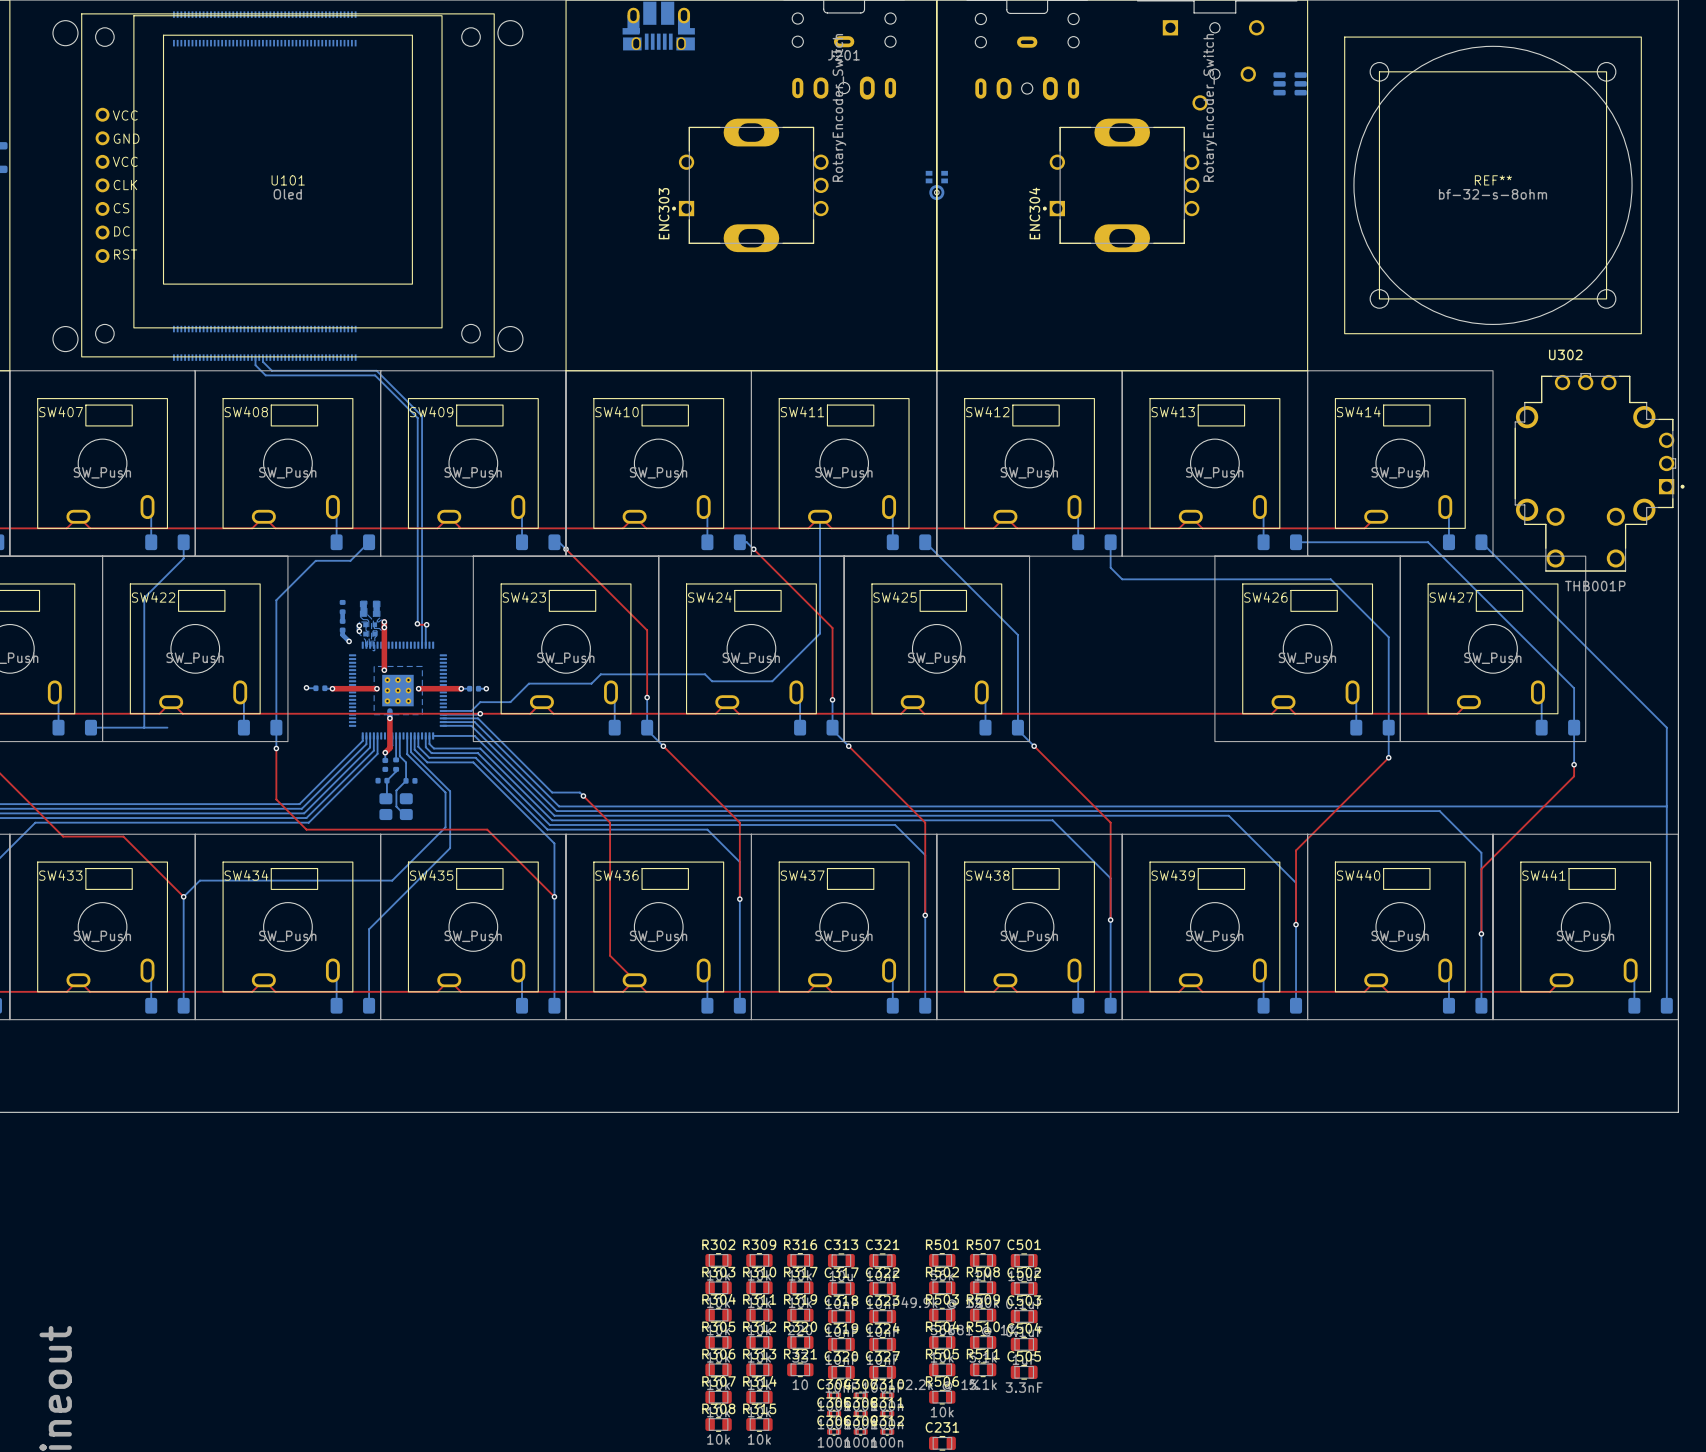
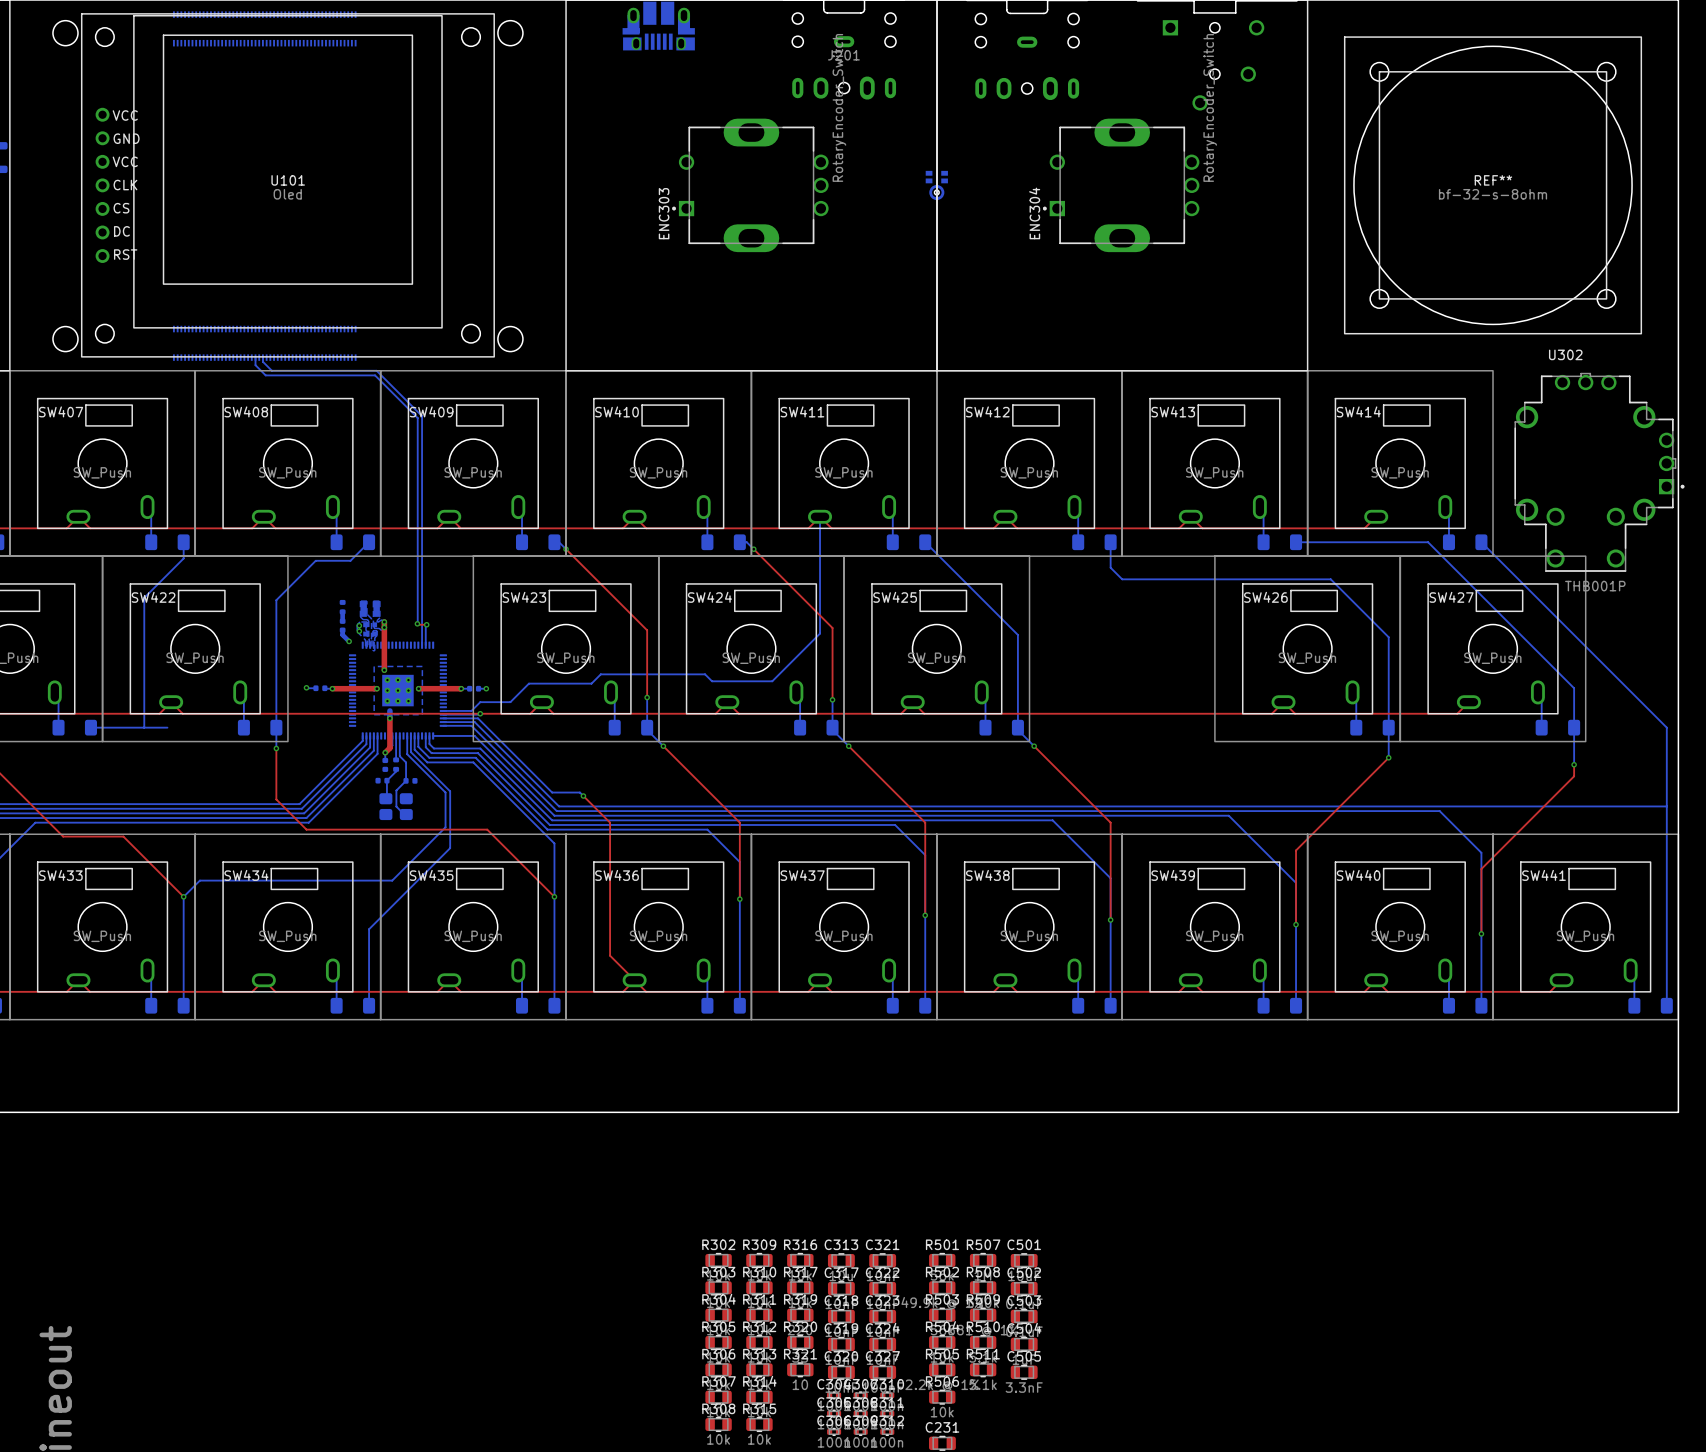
part: (1290, 83) -> none

